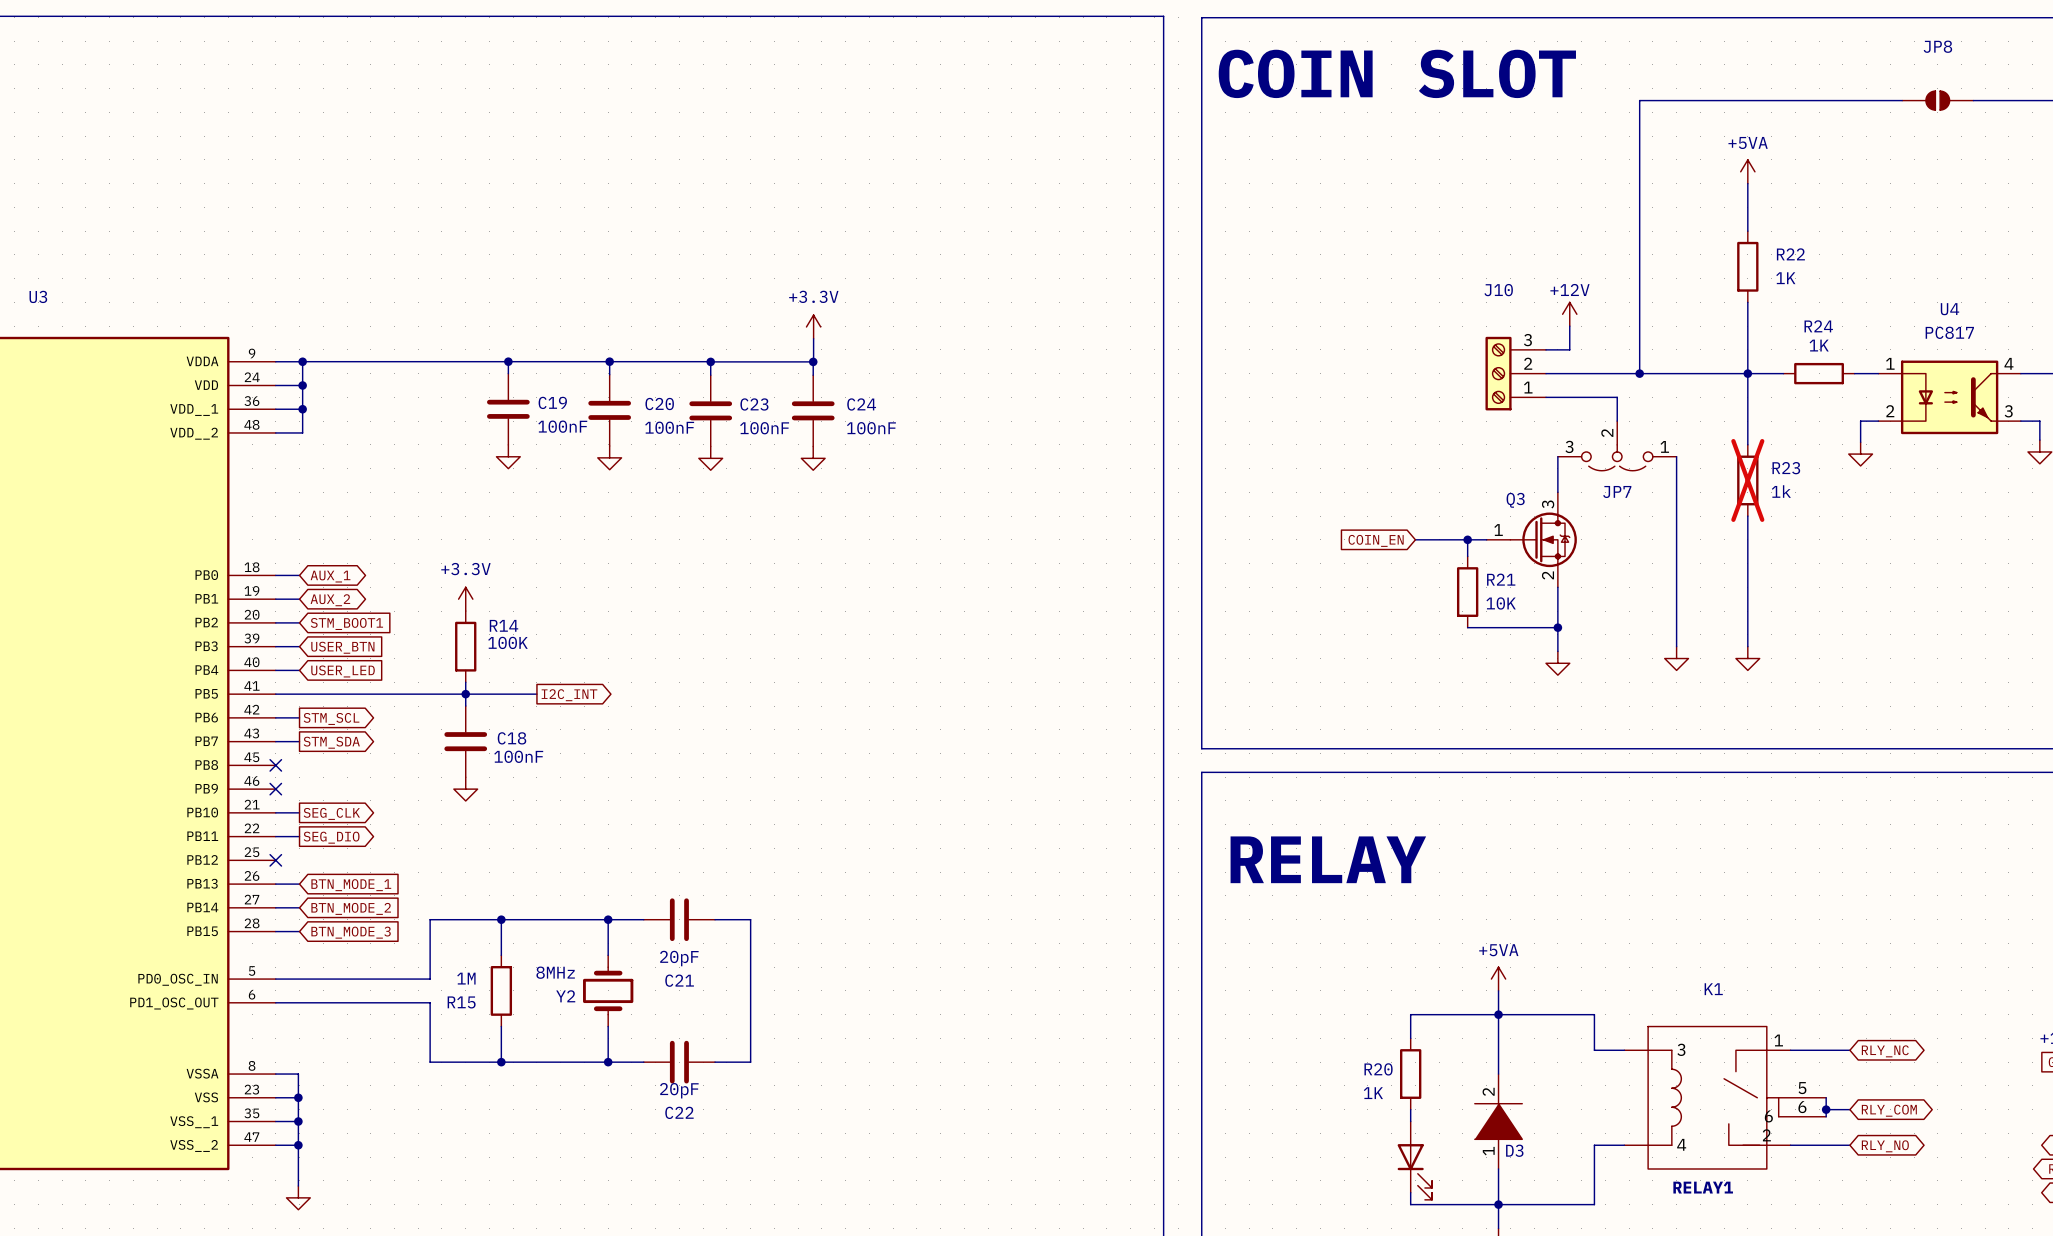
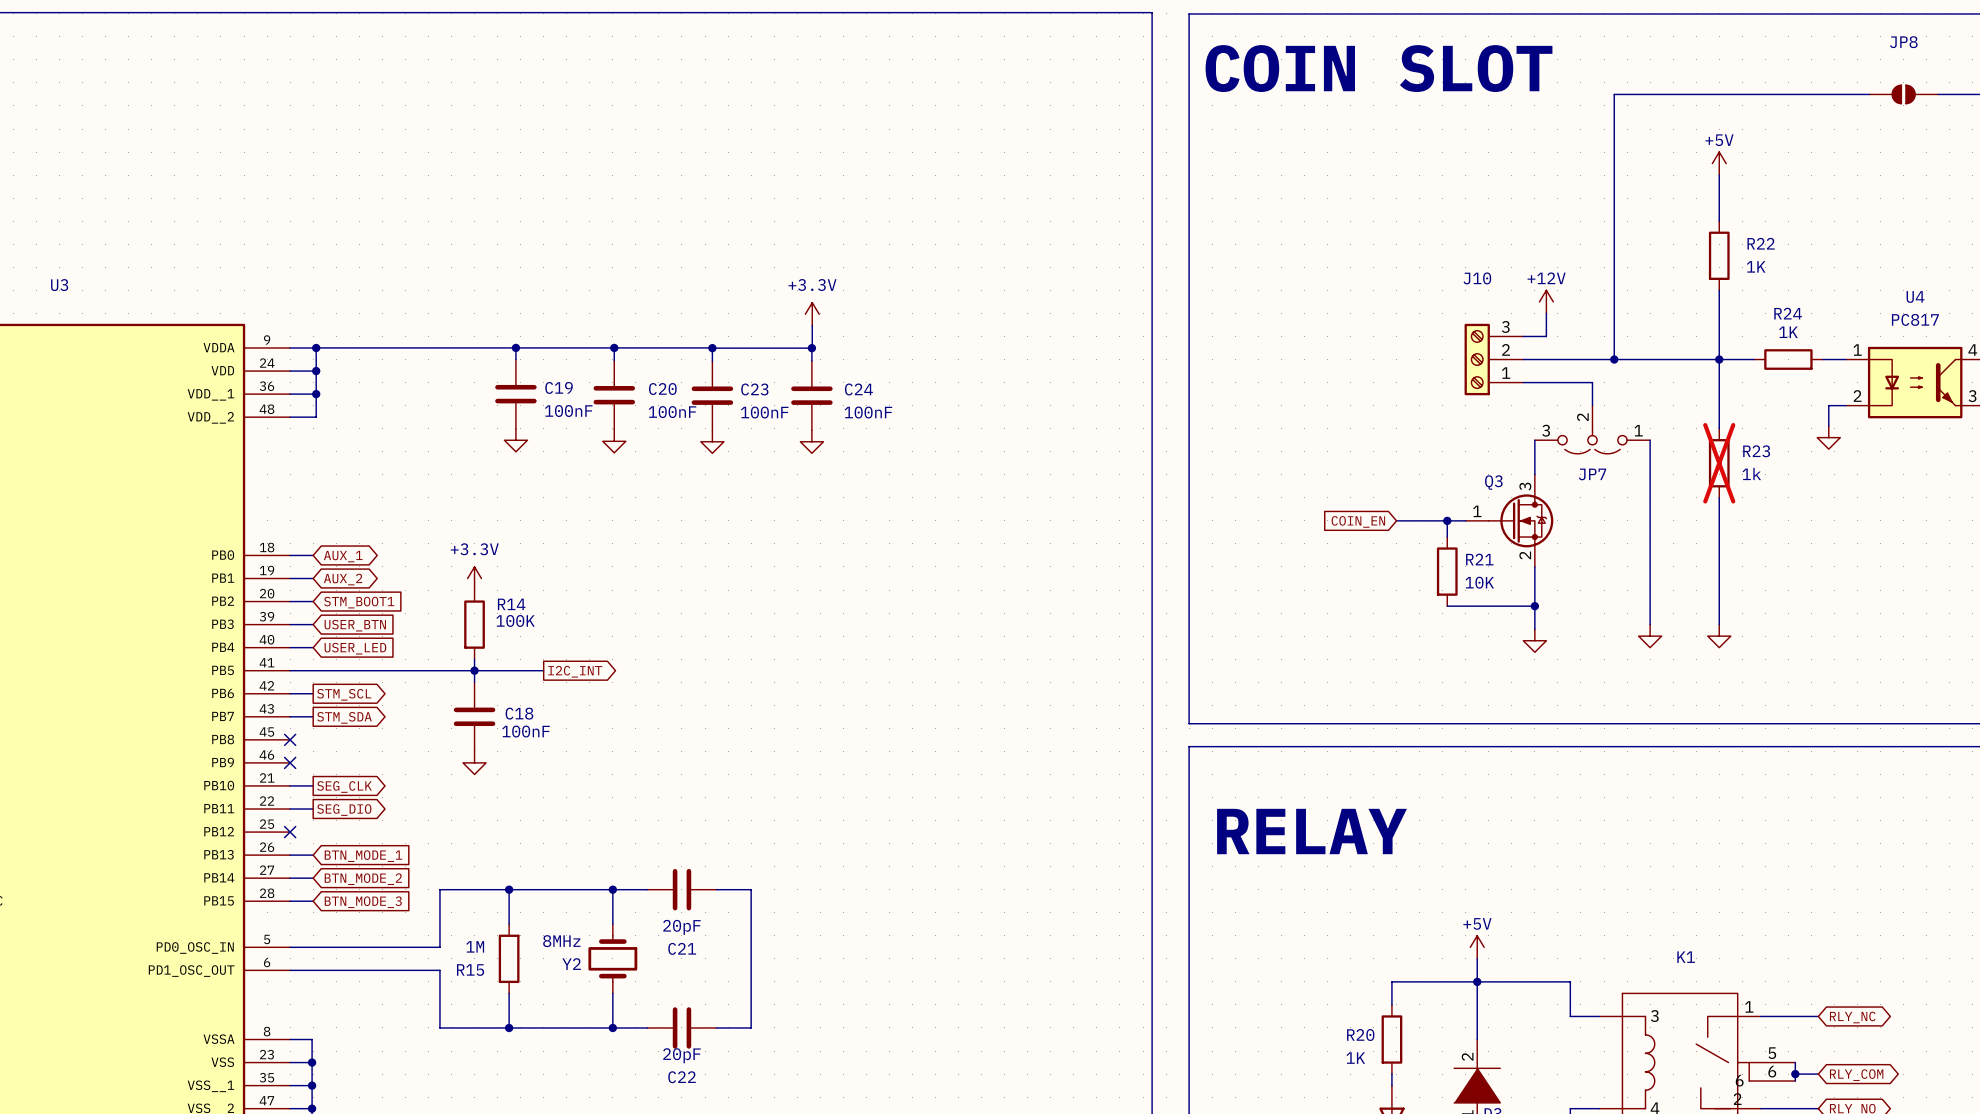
power symbol: +5VA (1747, 171) -> +5V (1719, 163)
power symbol: +5VA (1498, 979) -> +5V (1477, 947)

